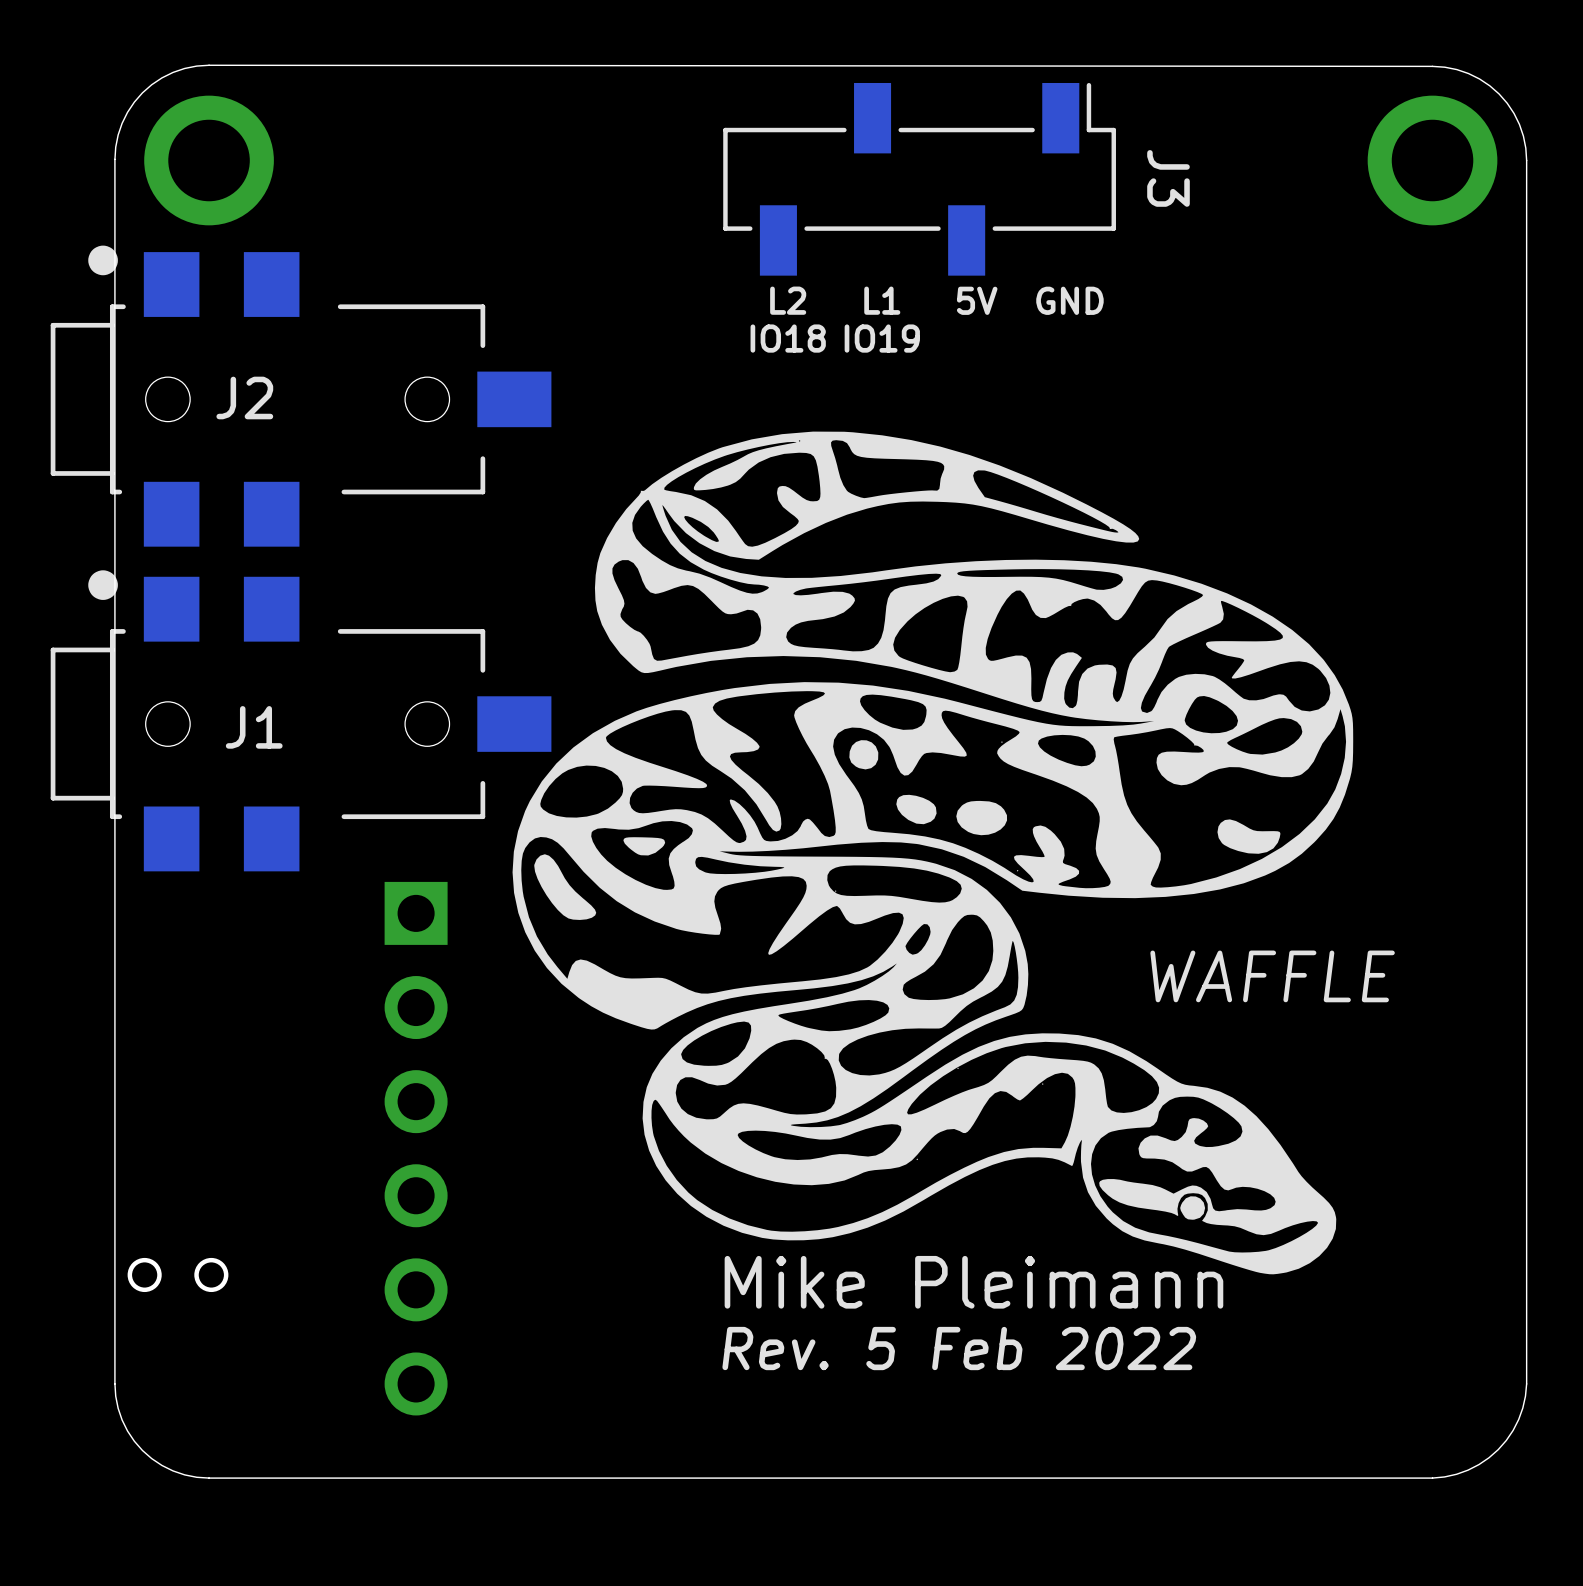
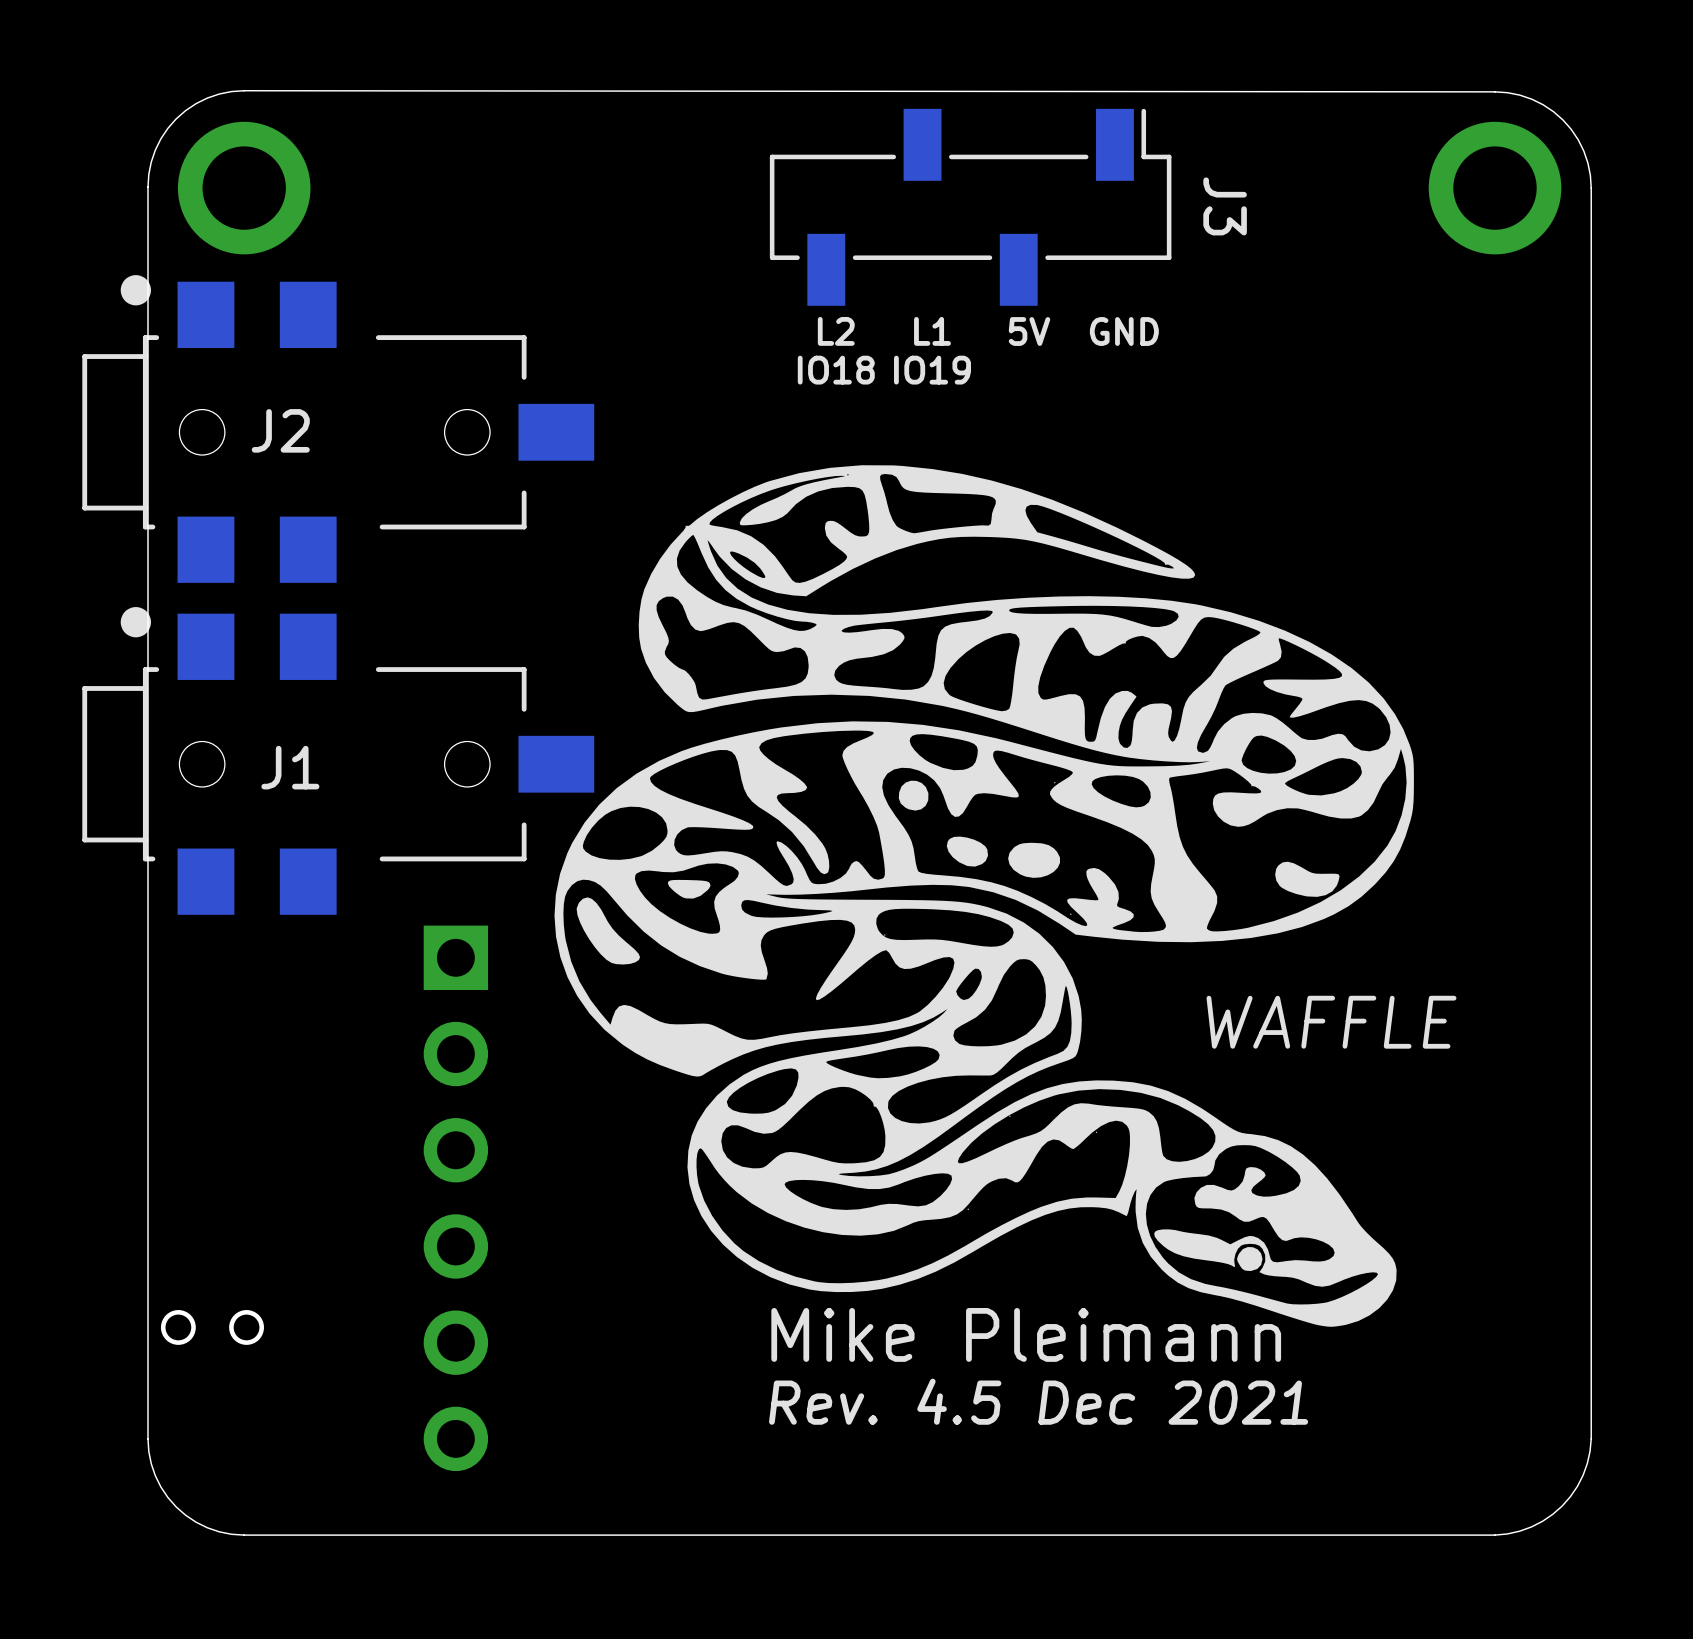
text: Rev. 5 Feb 2022 (959, 1348) -> Rev. 4.5 Dec 2021 (1038, 1401)

